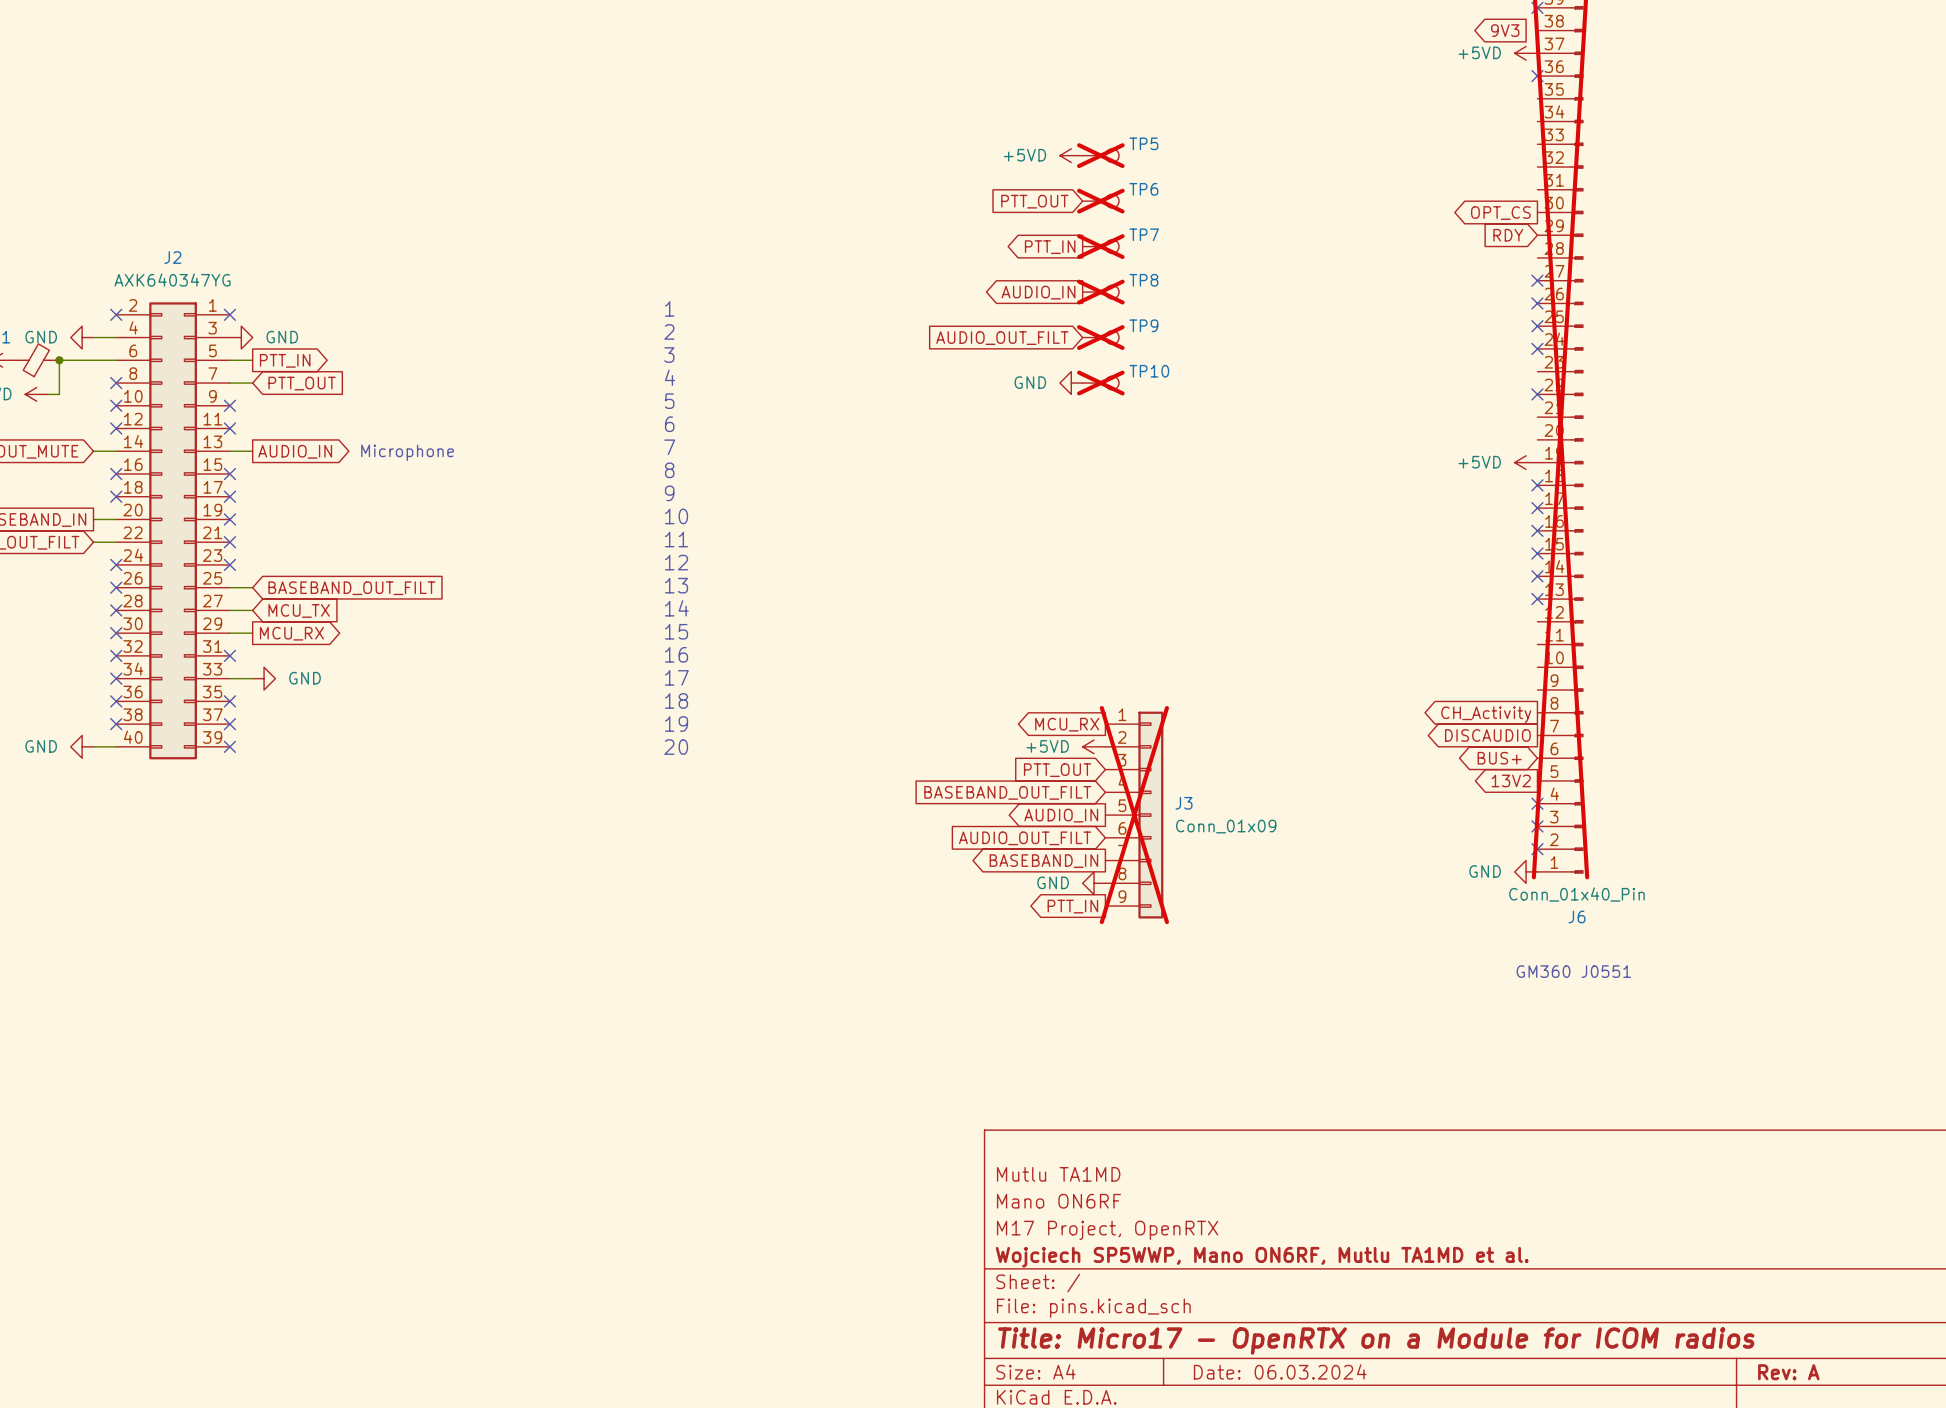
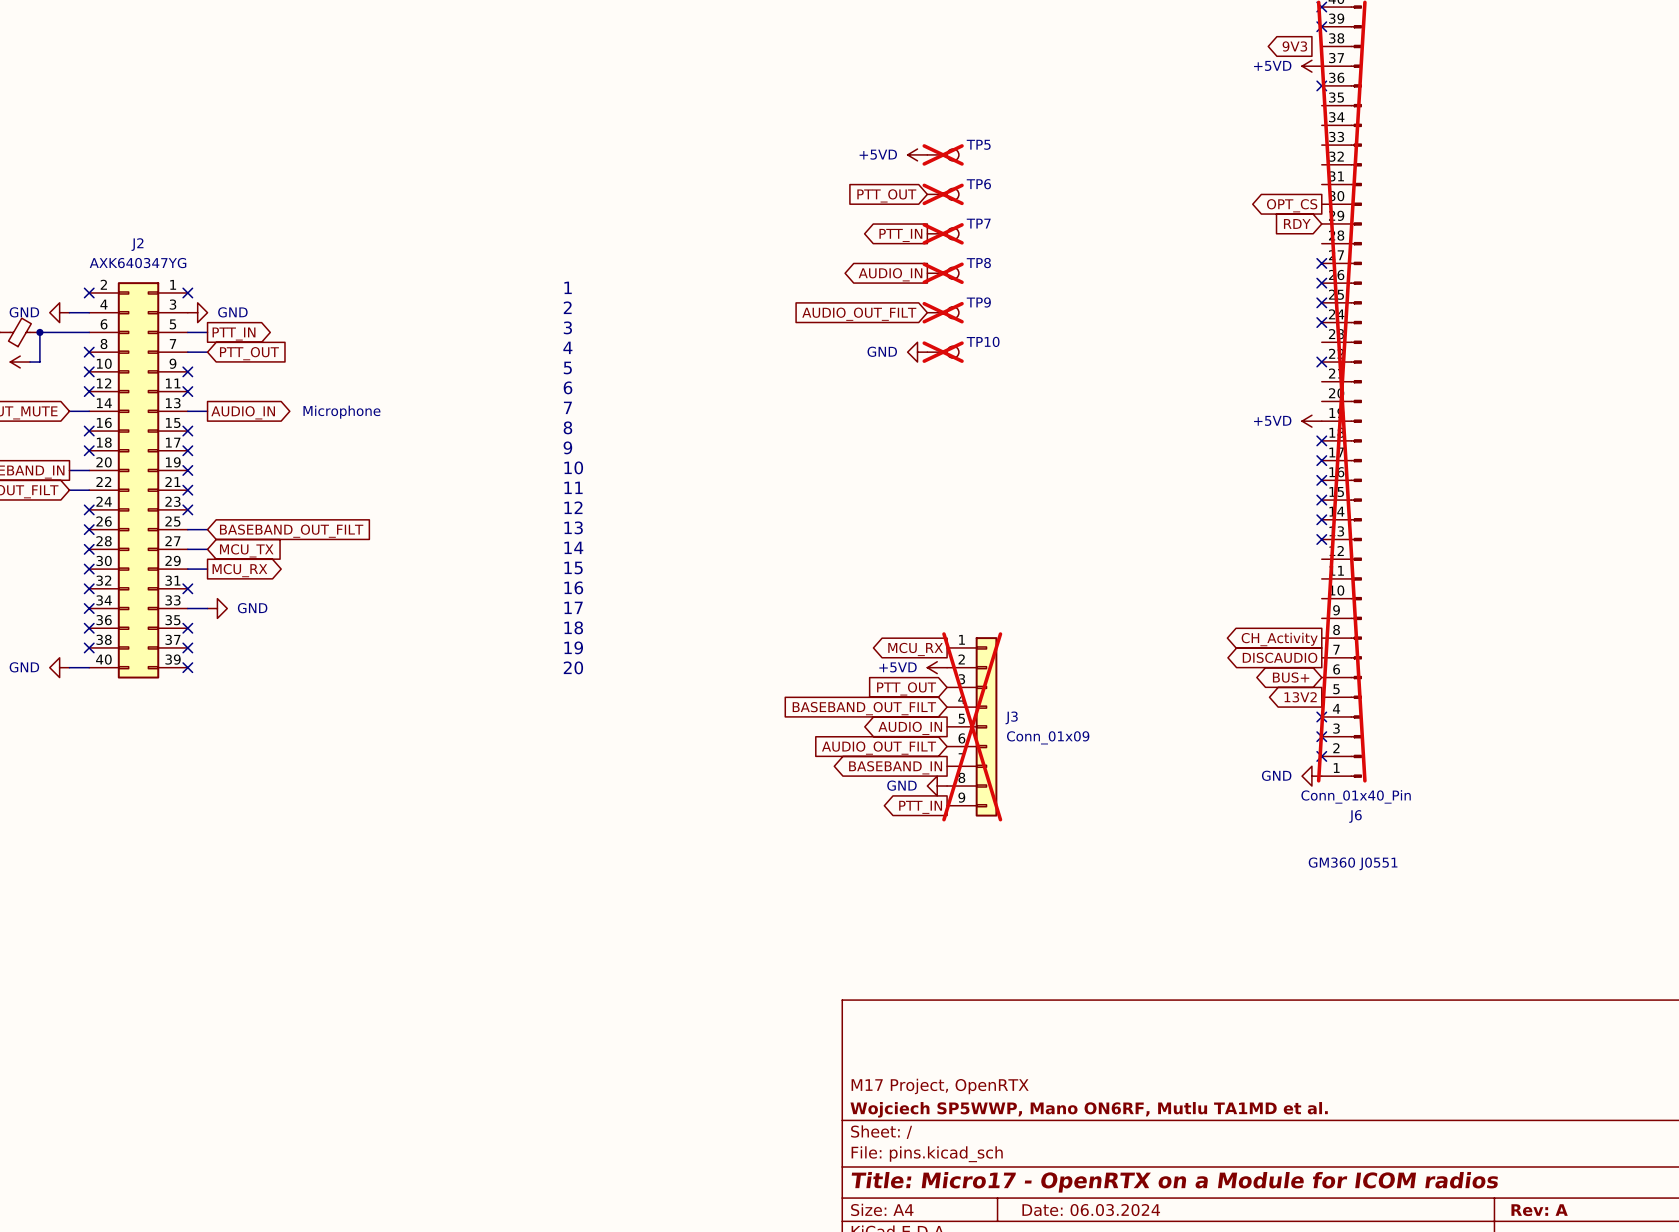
title block: Mutlu TA1MD (1058, 1174) -> none
title block: Mano ON6RF (1058, 1201) -> none

